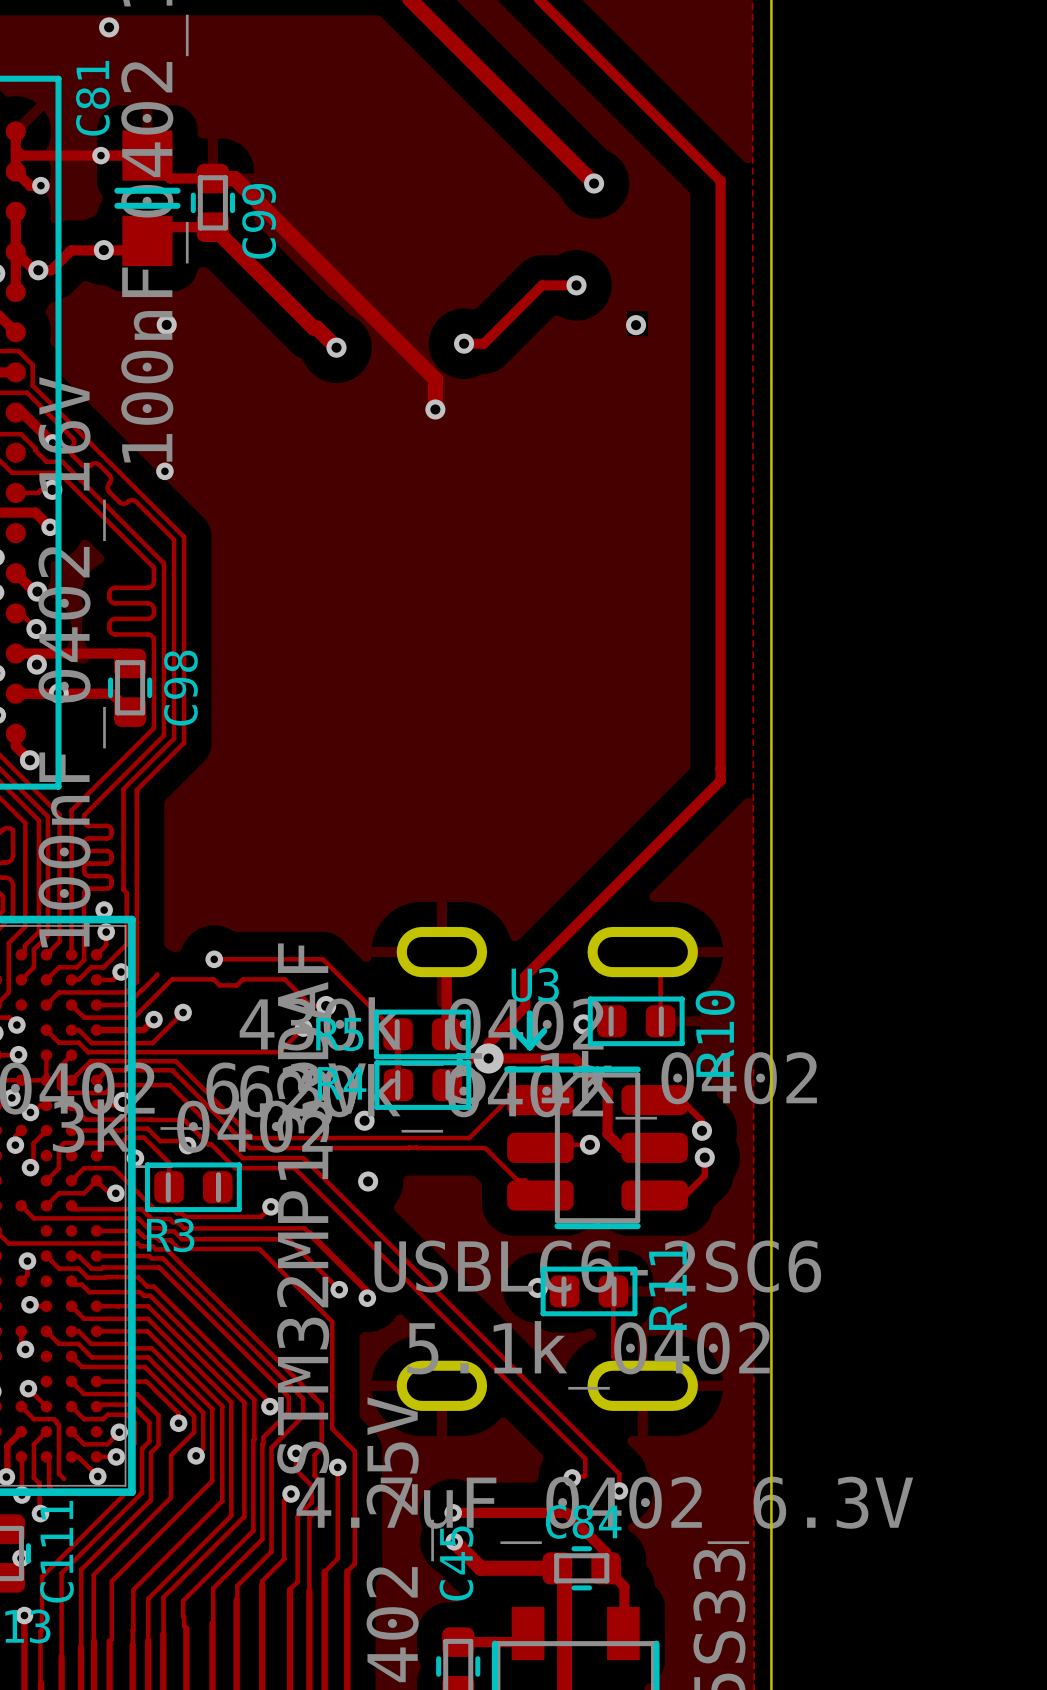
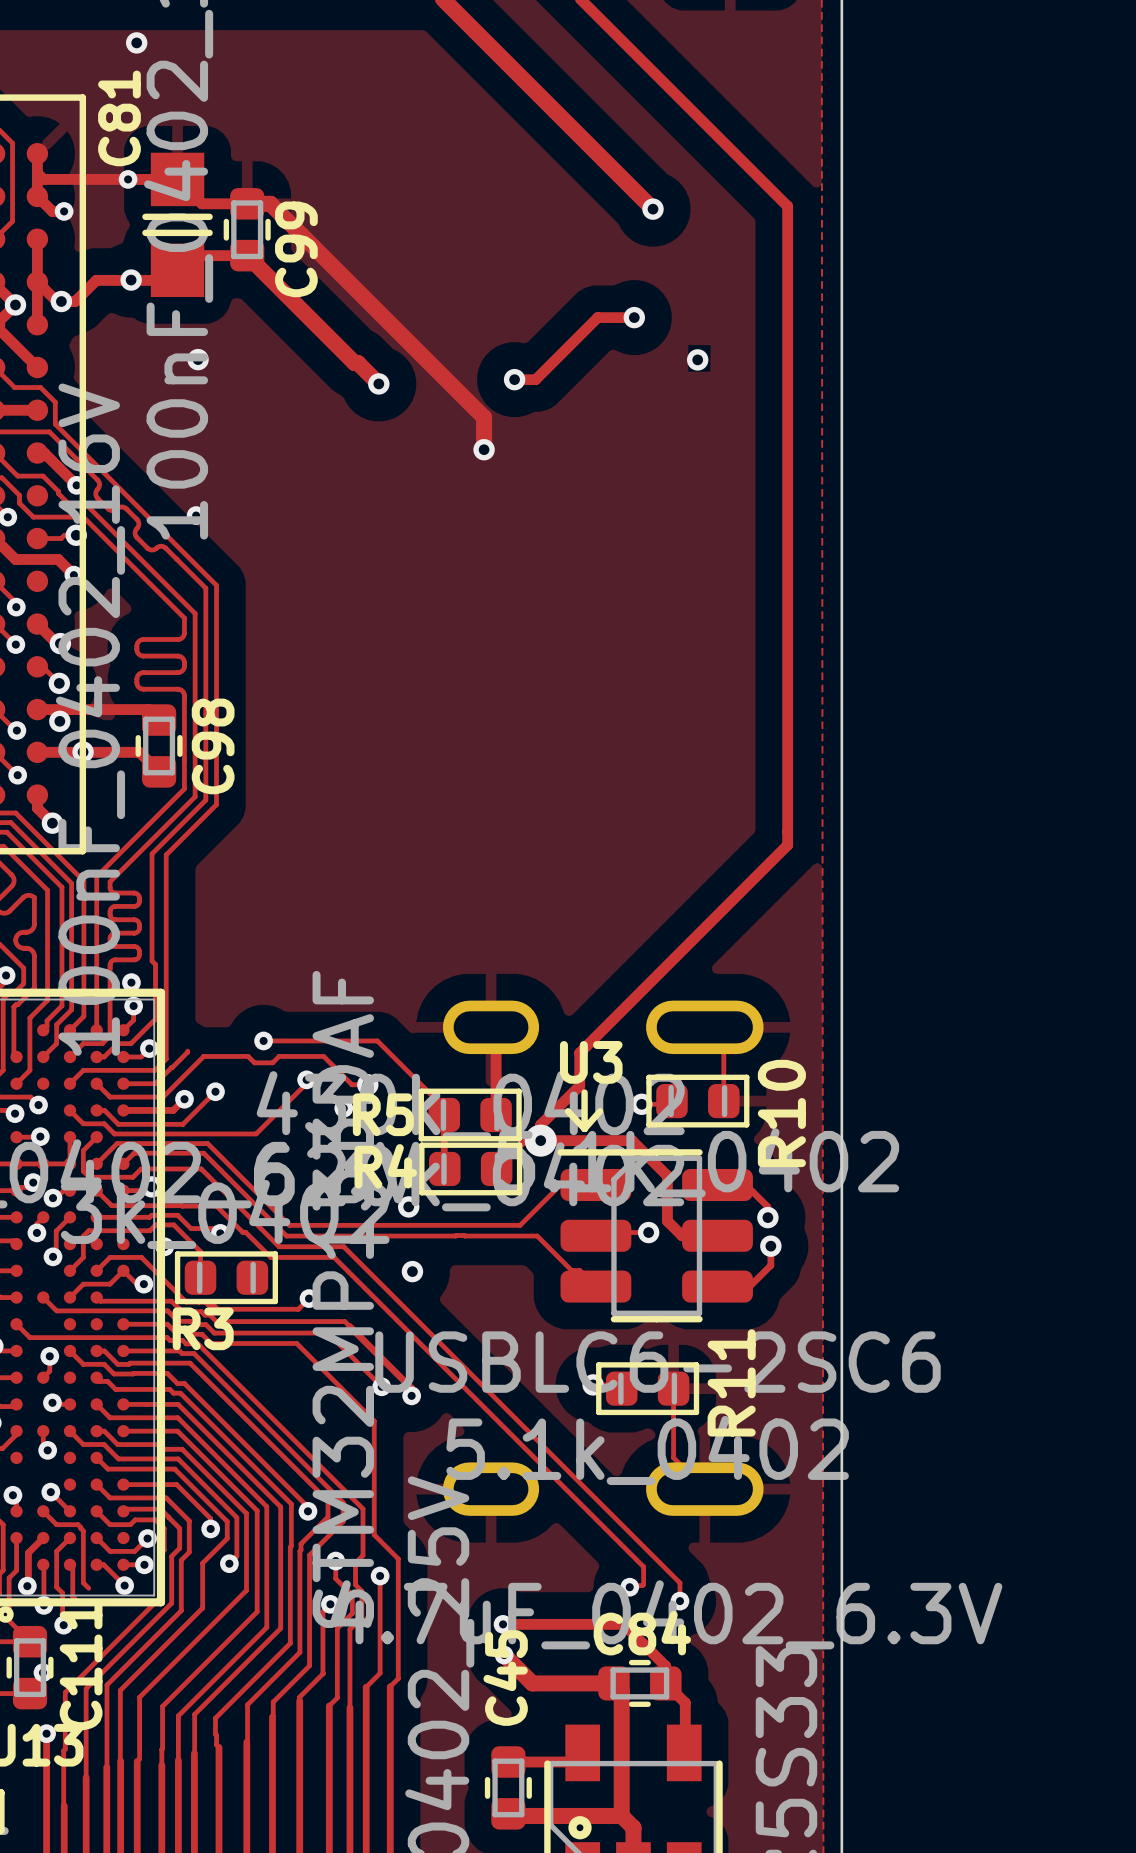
track: (214, 959) (322, 959) (397, 1034) -> (263, 1040) (377, 1040) (444, 1107) (444, 1114)
via position: (214, 959) -> (263, 1040)
via: none -> (306, 1079)
track: (303, 1028) (279, 1052) (221, 1052) -> (306, 1079) (306, 1083) (256, 1133)

